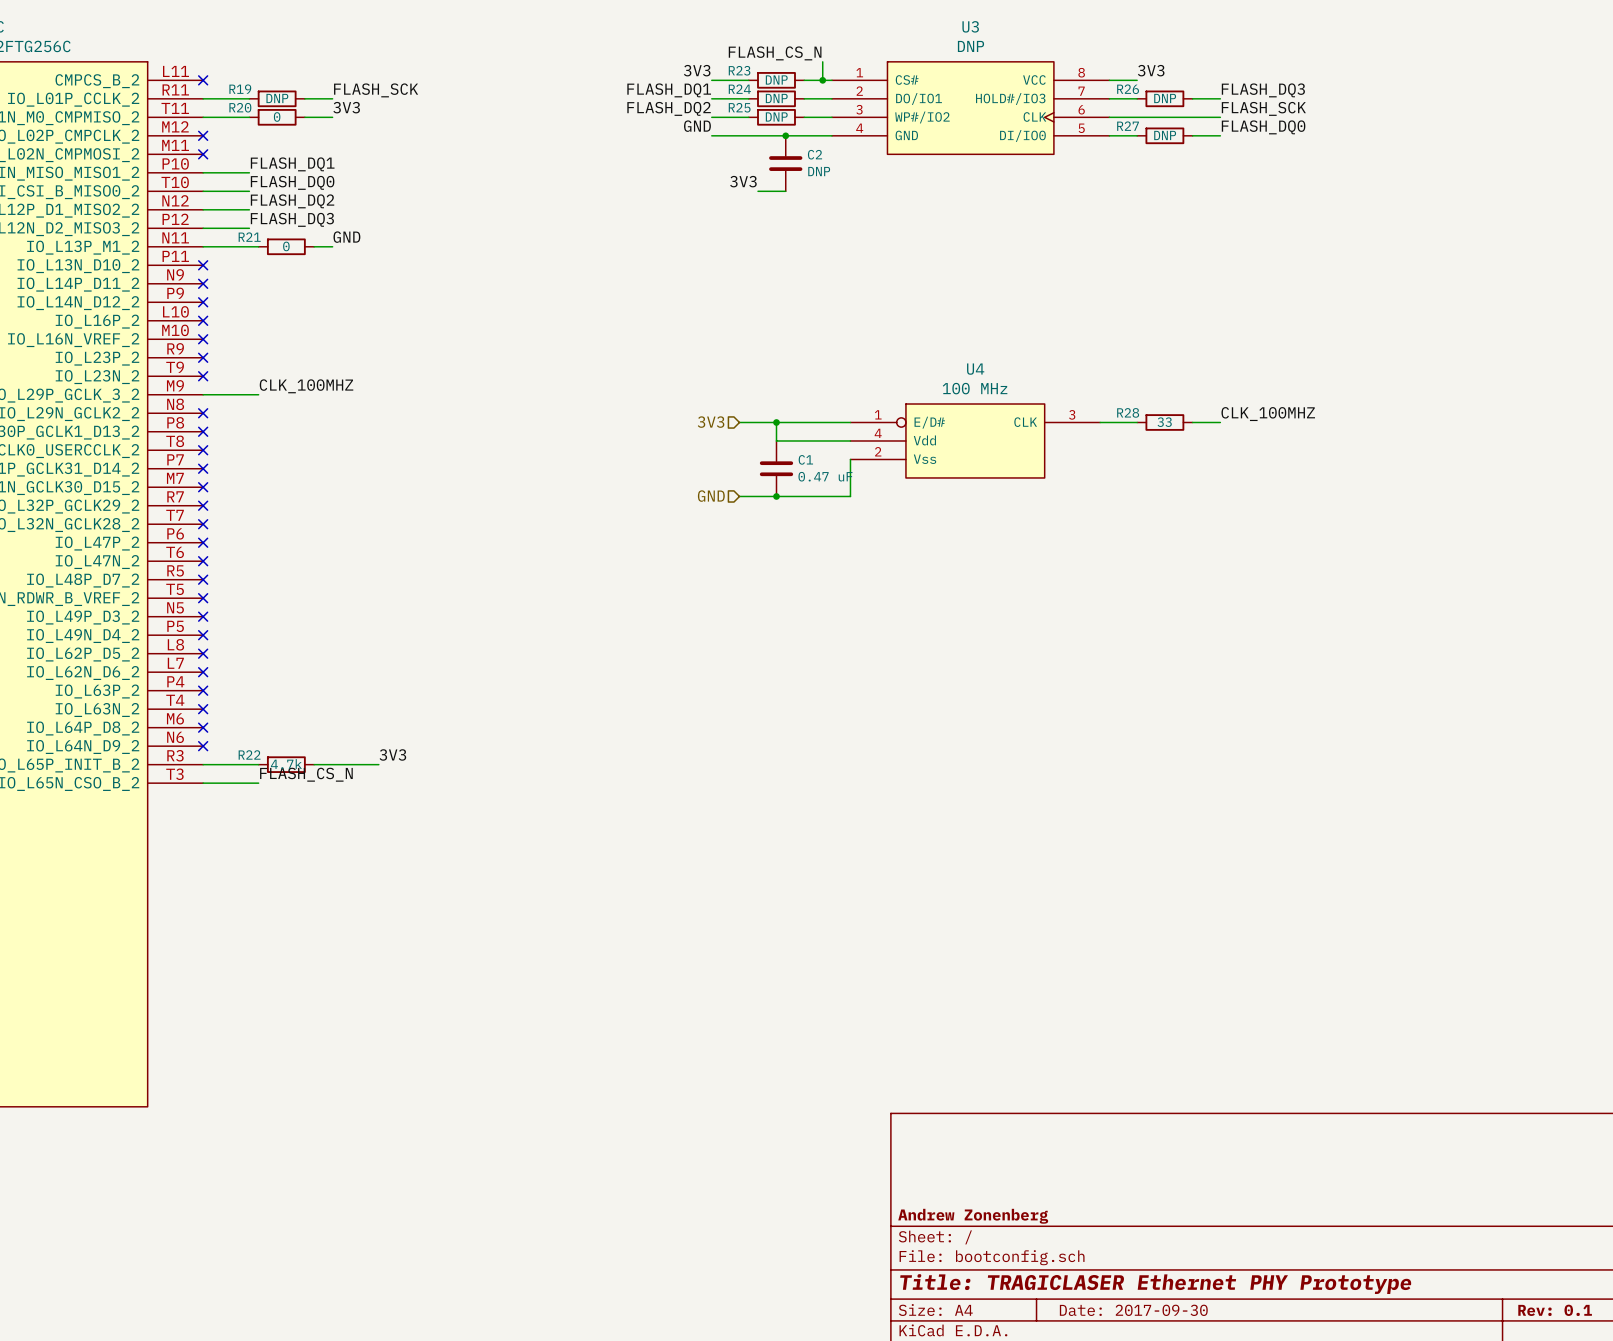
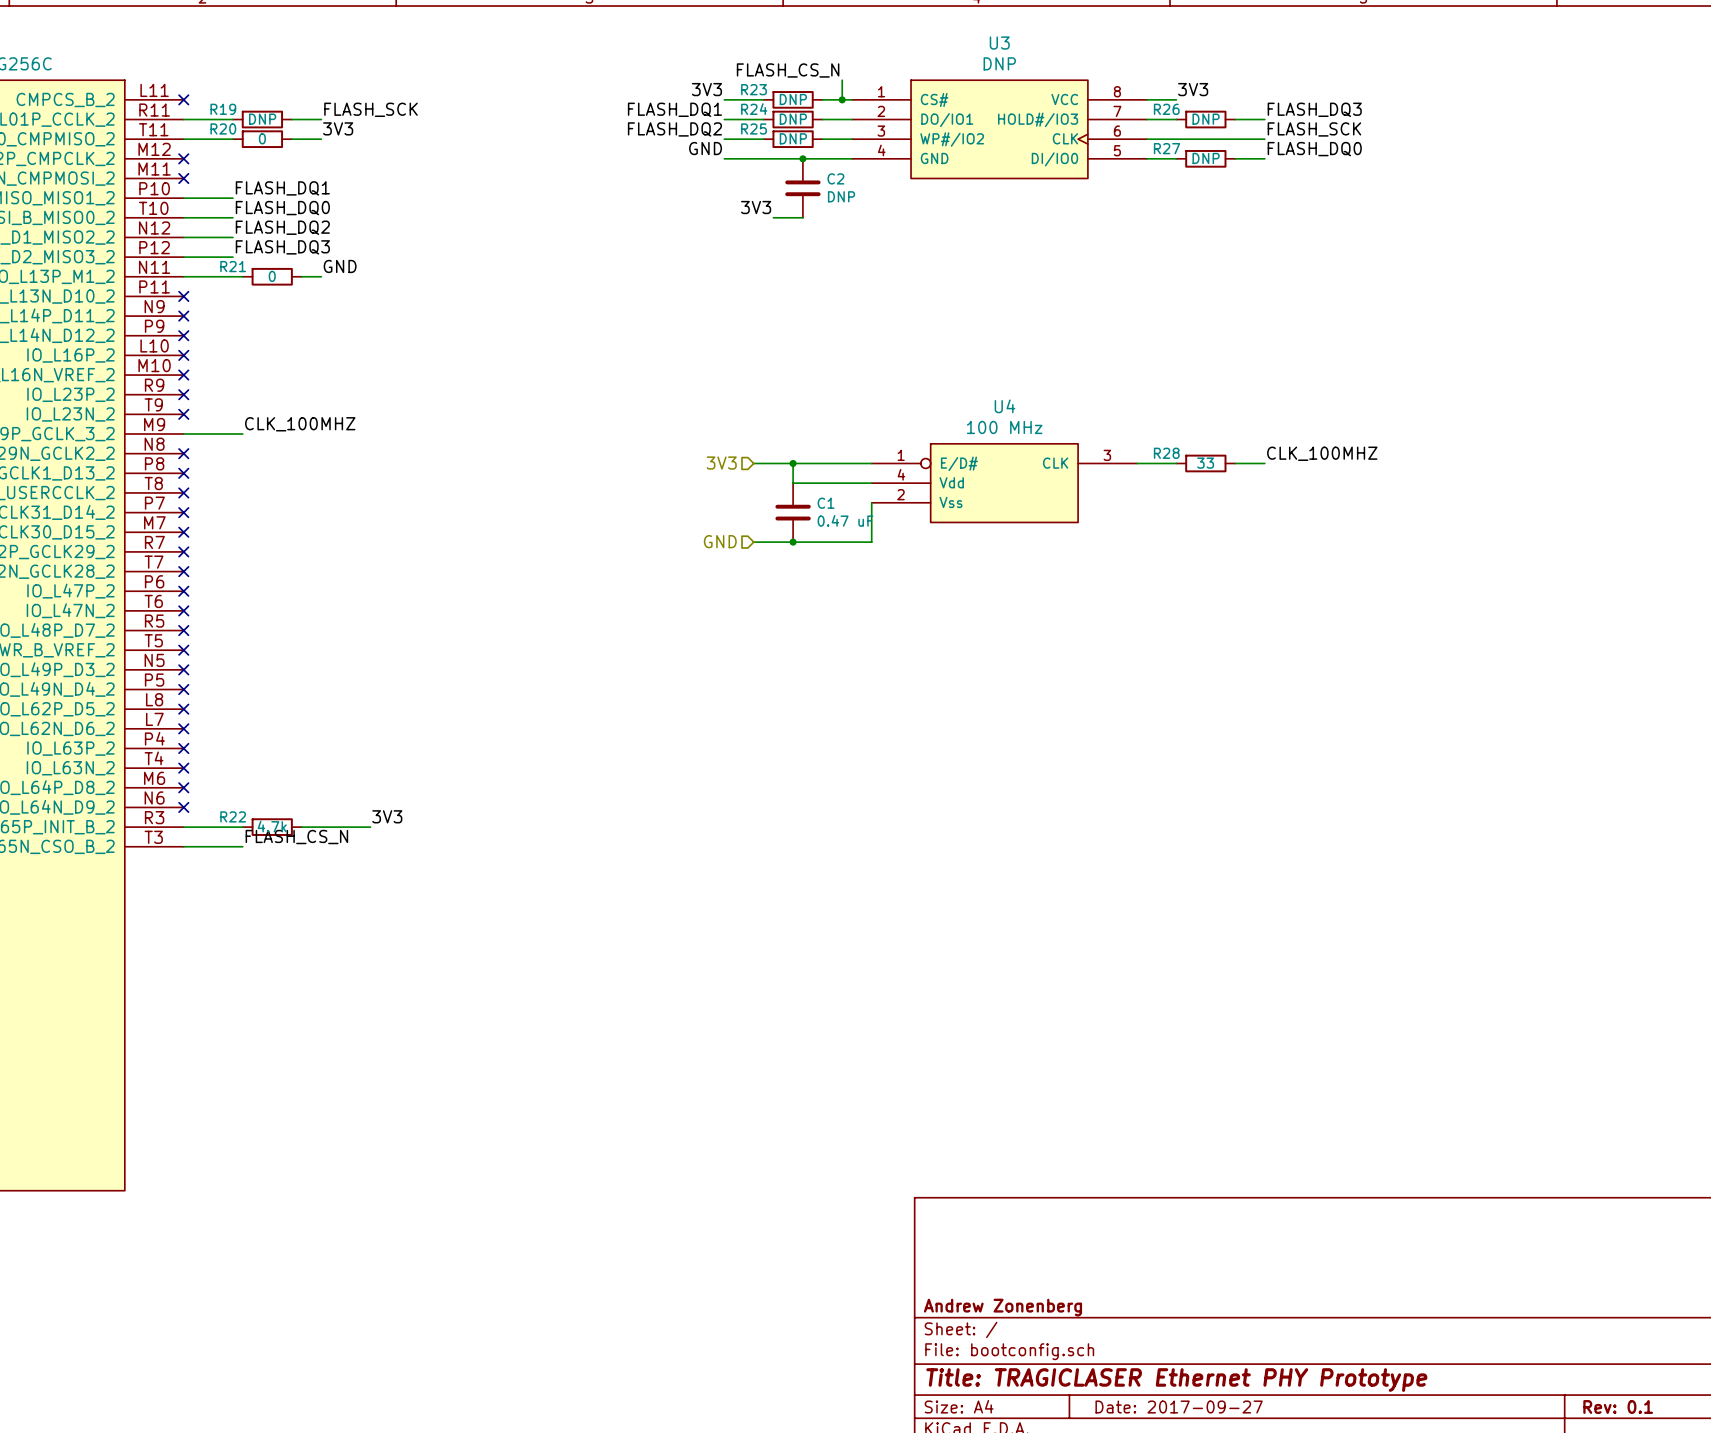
title block: Date: 2017-09-30 (1133, 1310) -> Date: 2017-09-27 (1179, 1407)

